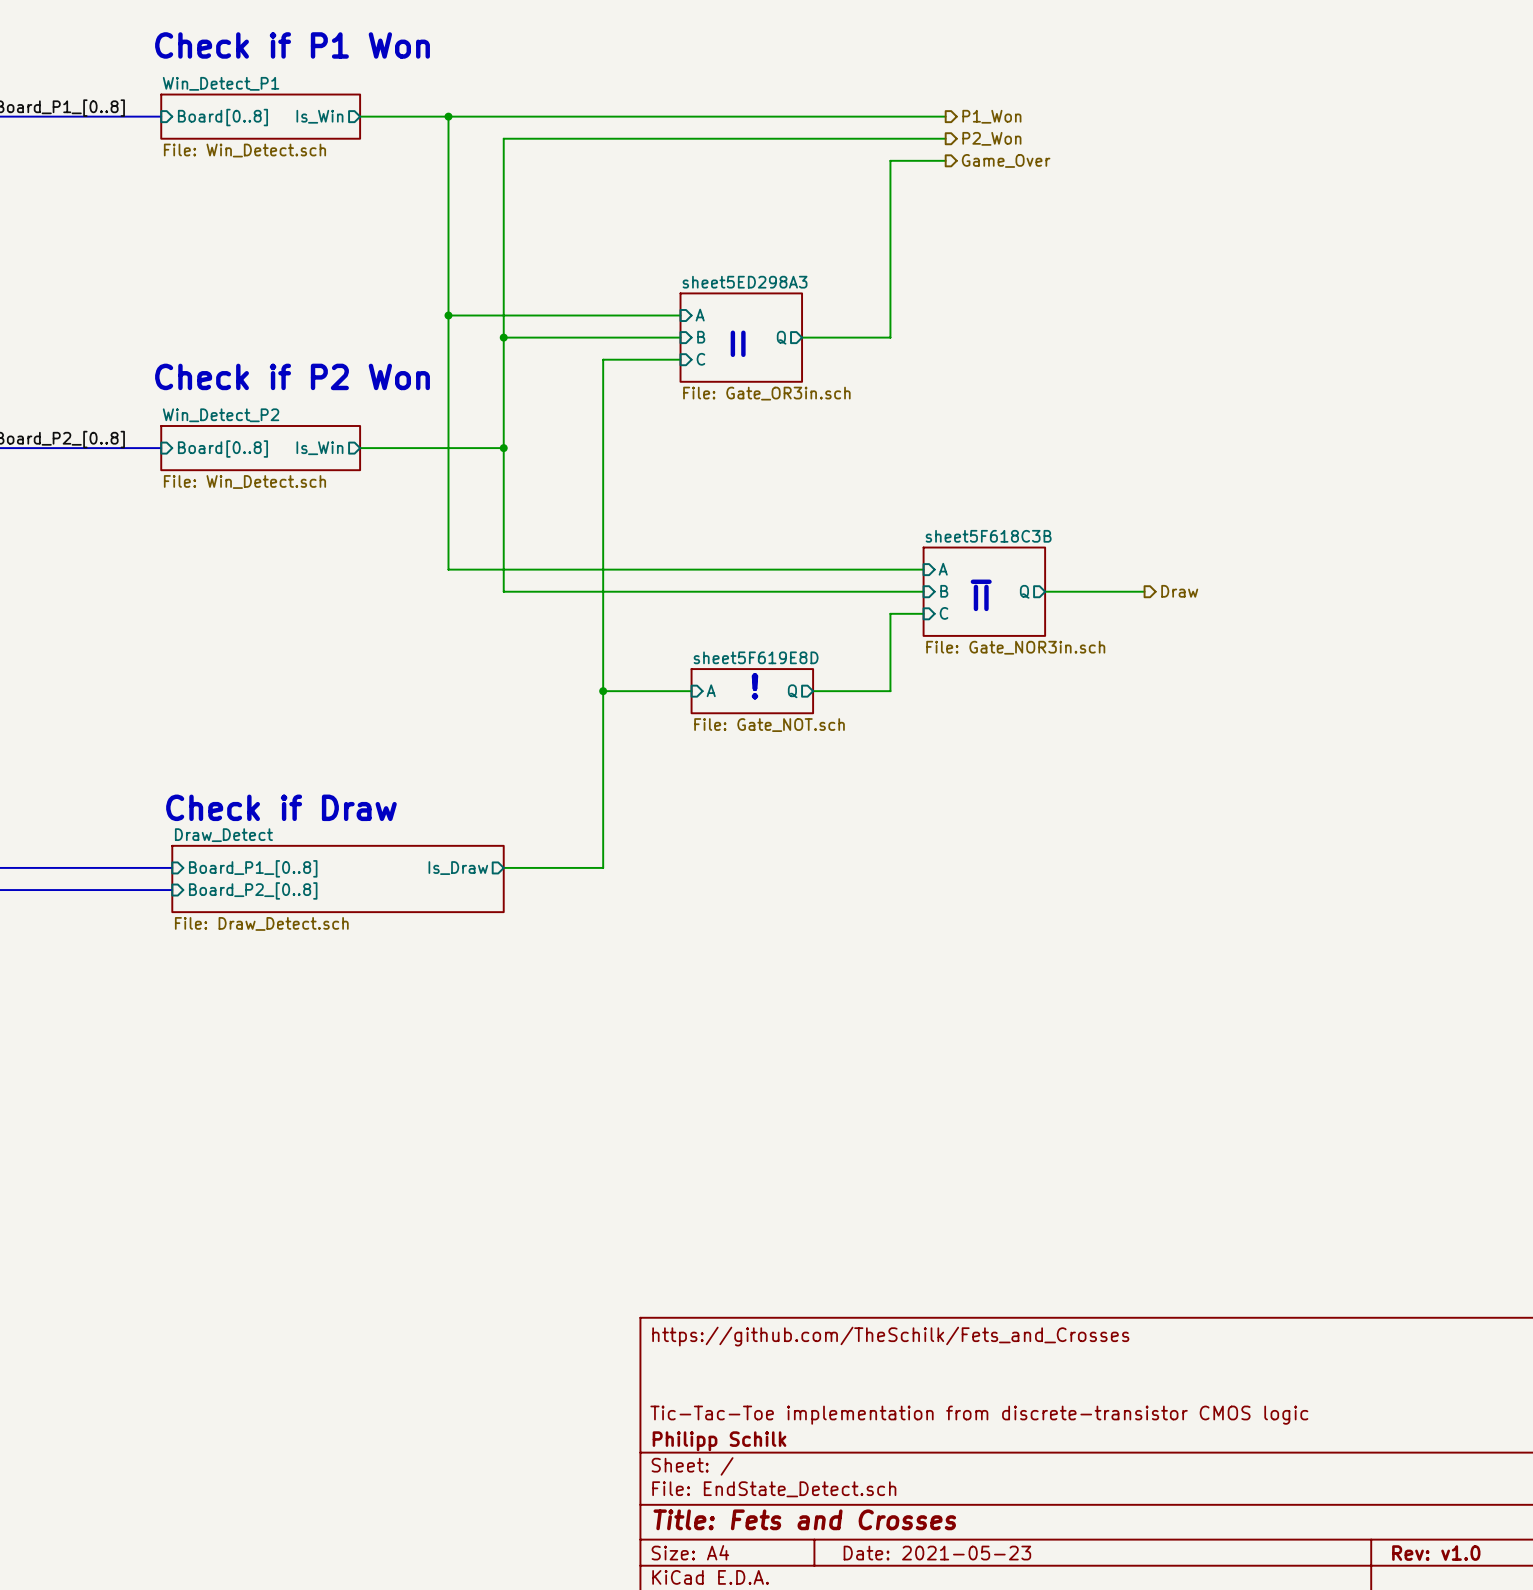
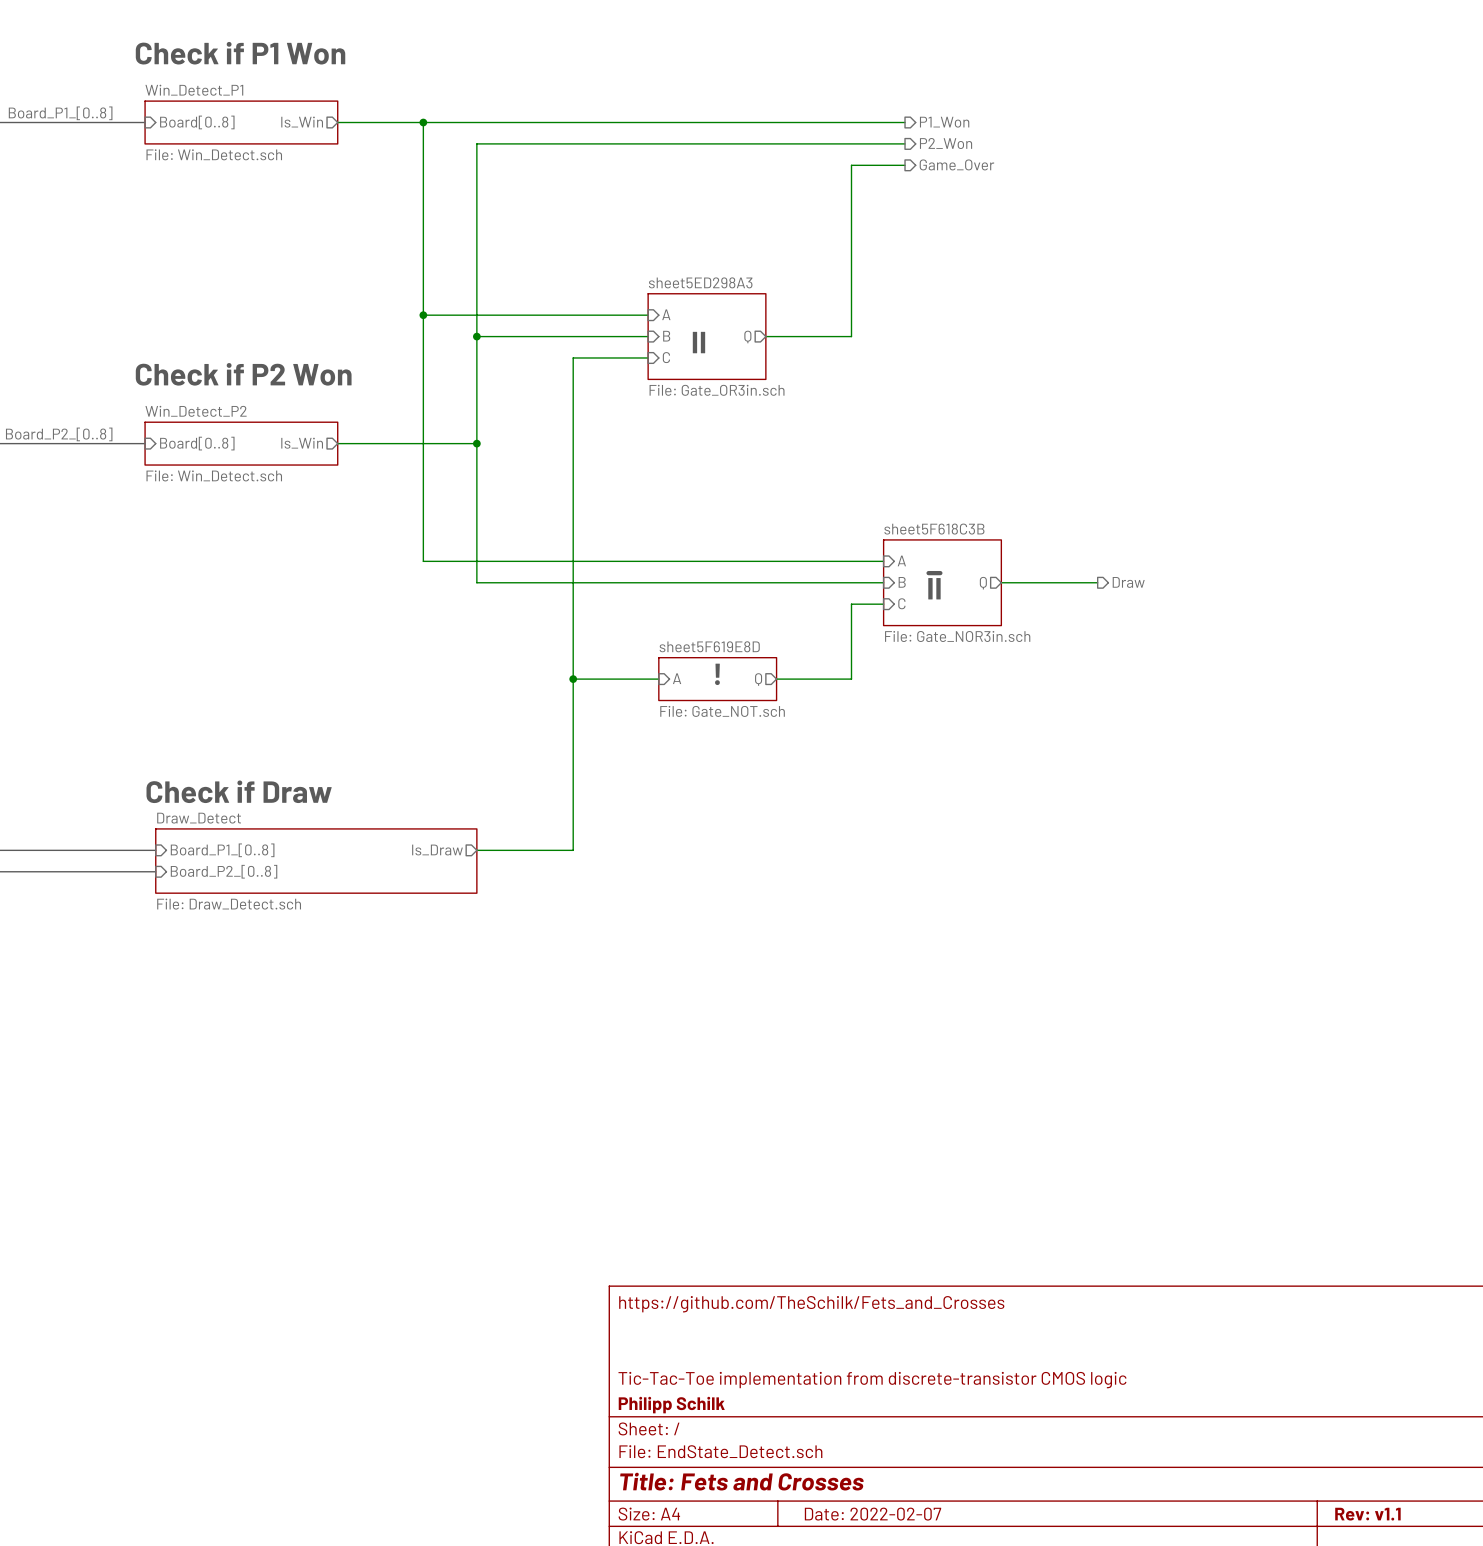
title block: Date: 2021-05-23 (937, 1553) -> Date: 2022-02-07 (873, 1514)
title block: Rev: v1.0 (1436, 1553) -> Rev: v1.1 (1367, 1514)

